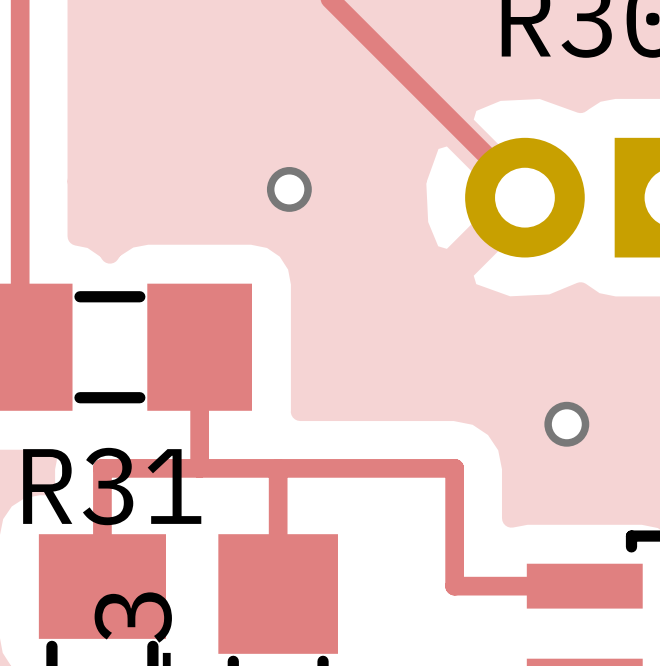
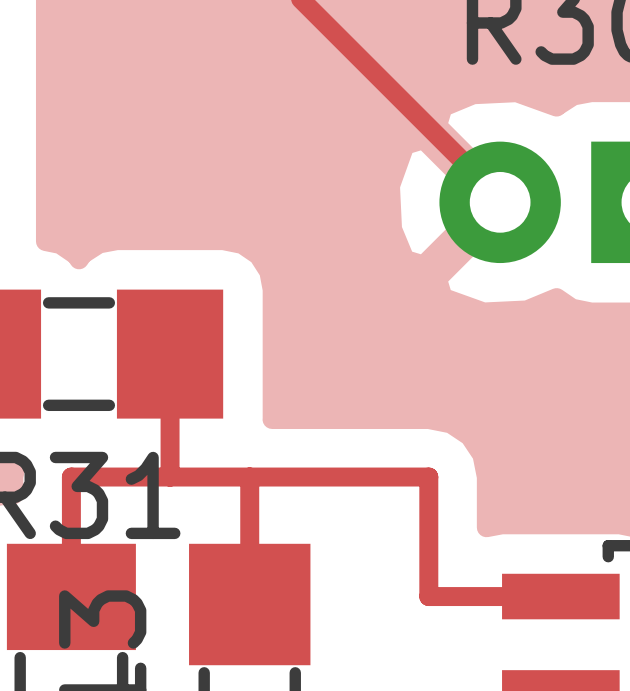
via: (289, 189) -> none
via: (566, 424) -> none

